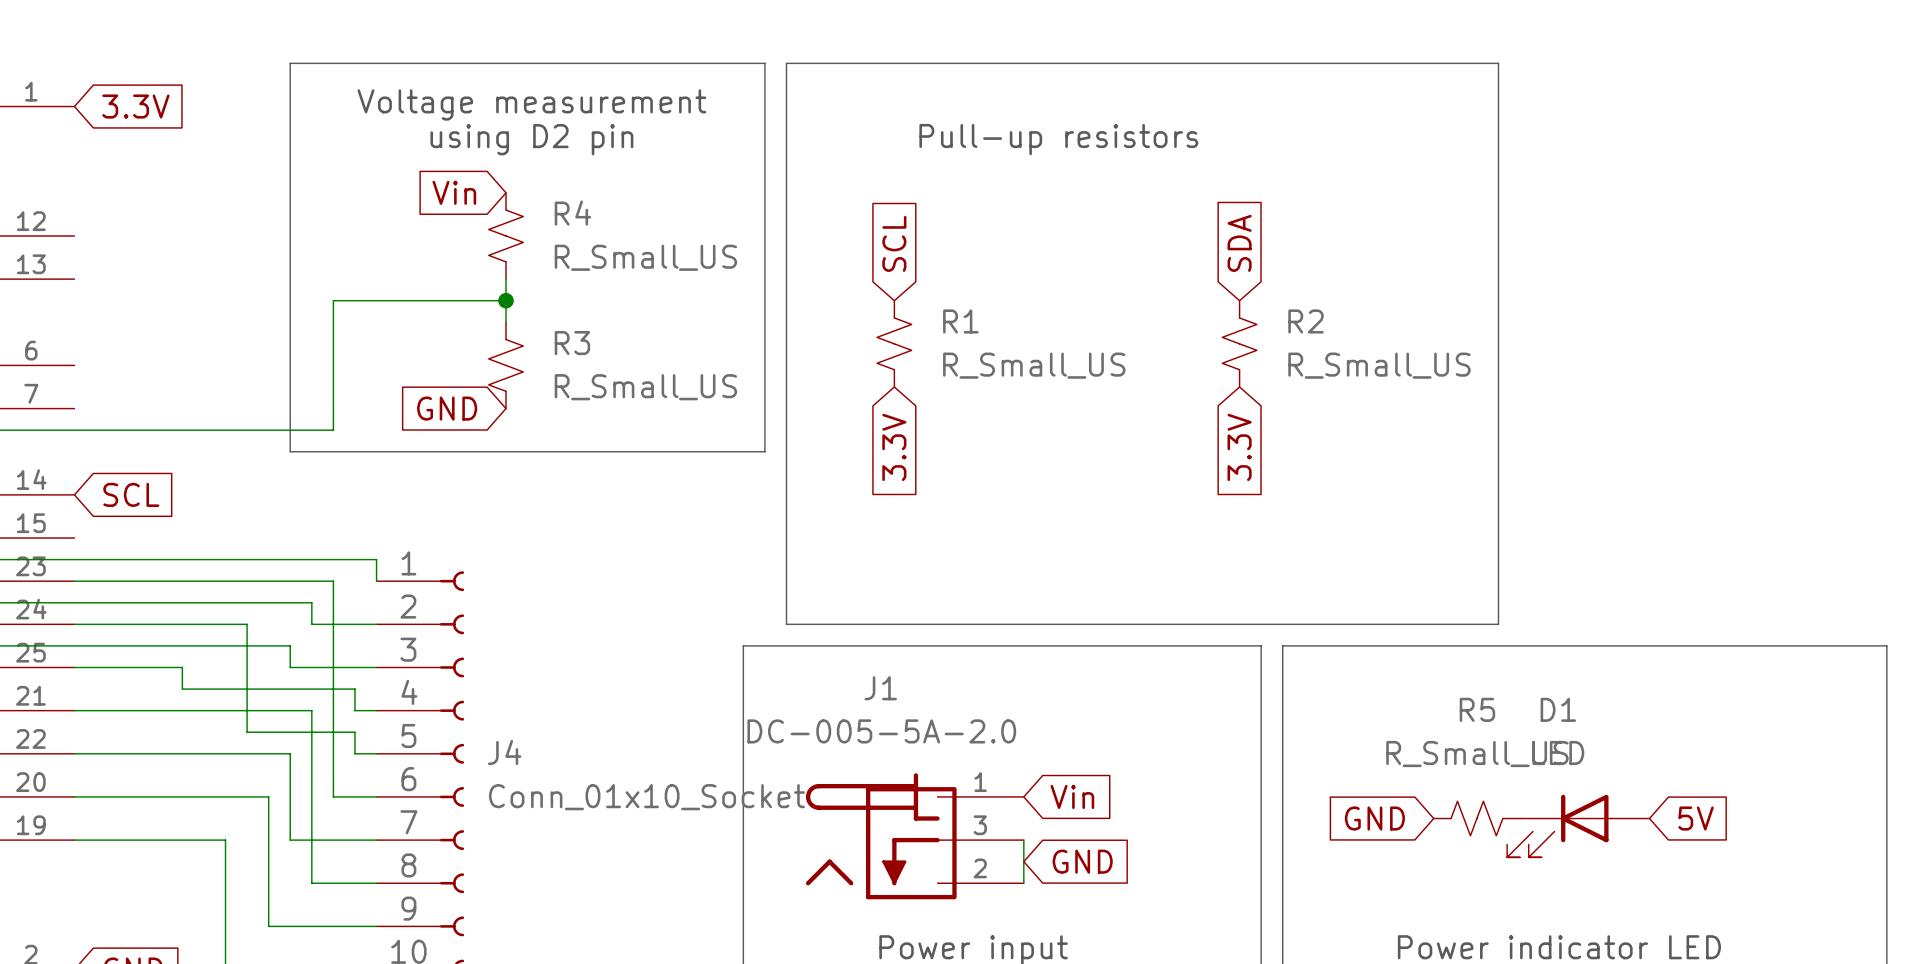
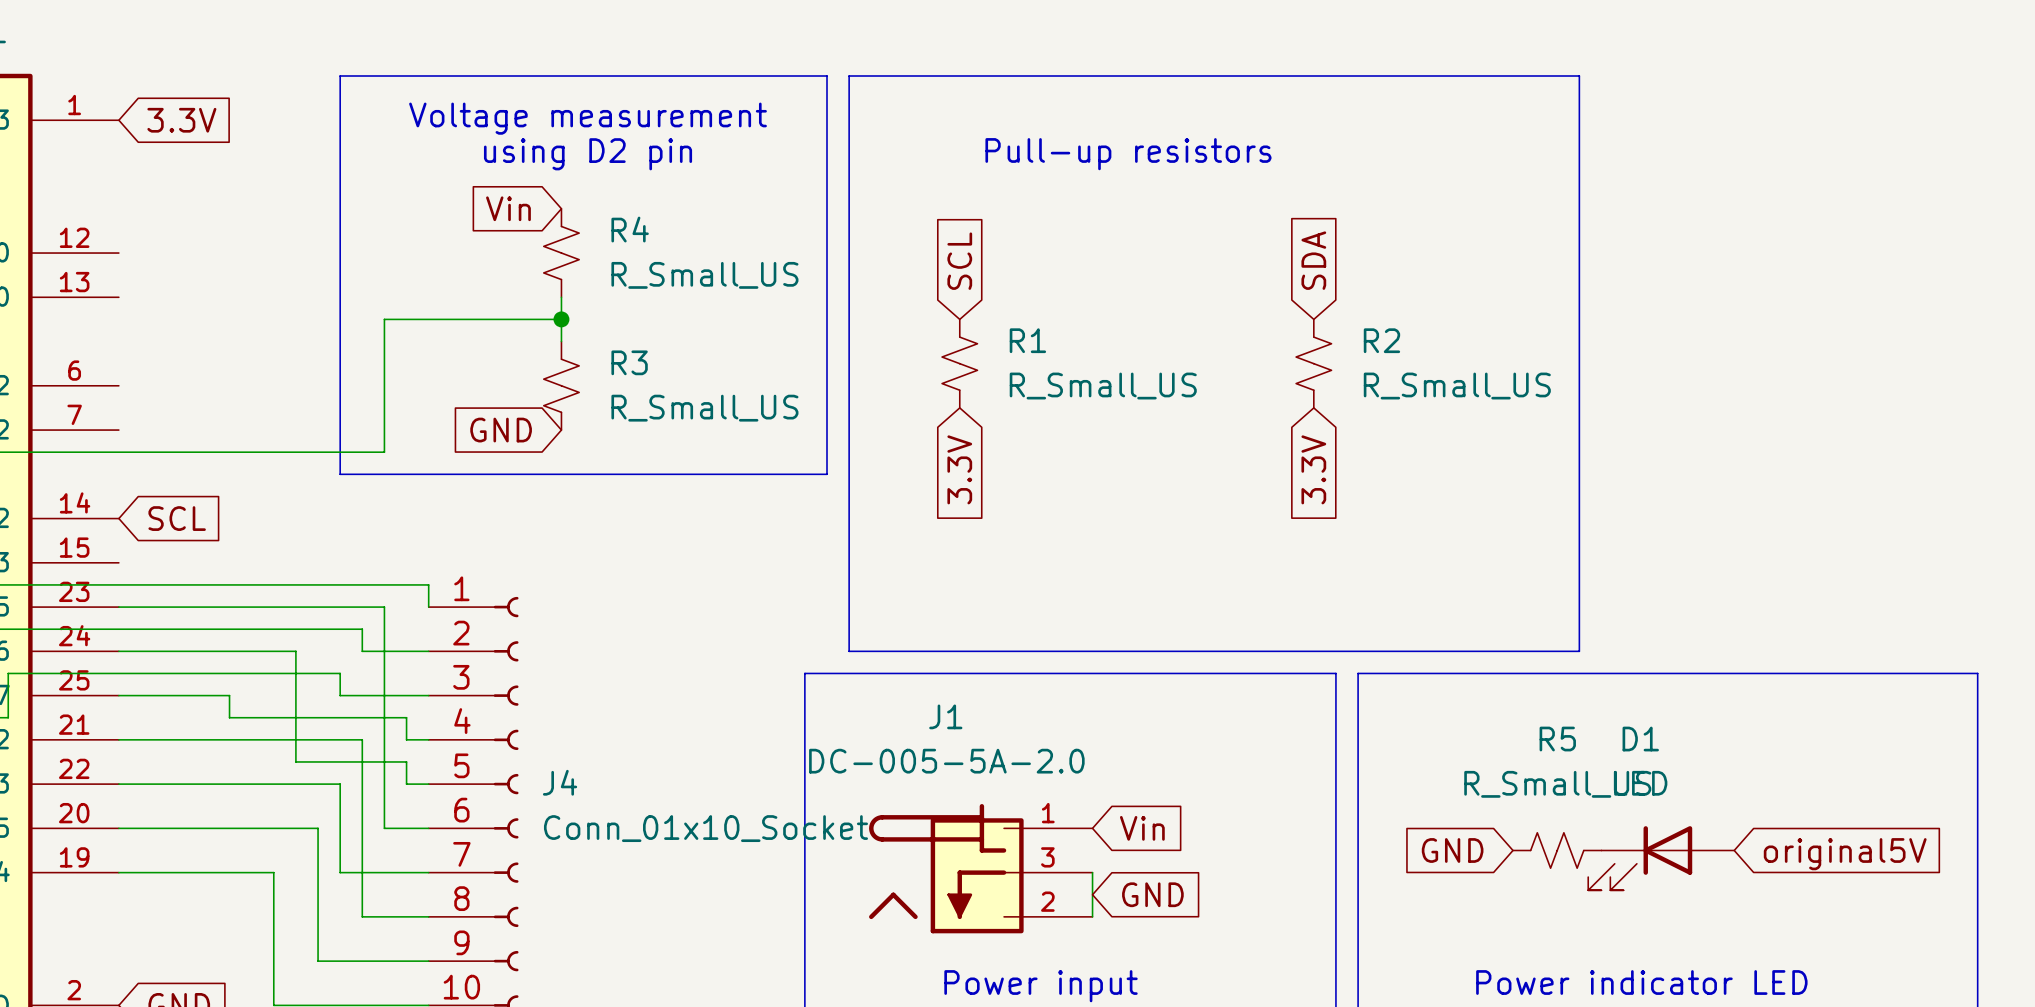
global label: 5V (1696, 818) -> original5V (1845, 854)

